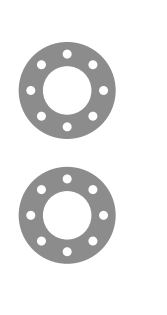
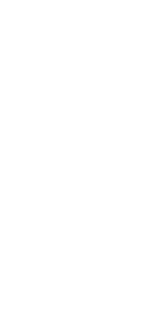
part: (67, 90) -> none
part: (67, 215) -> none

